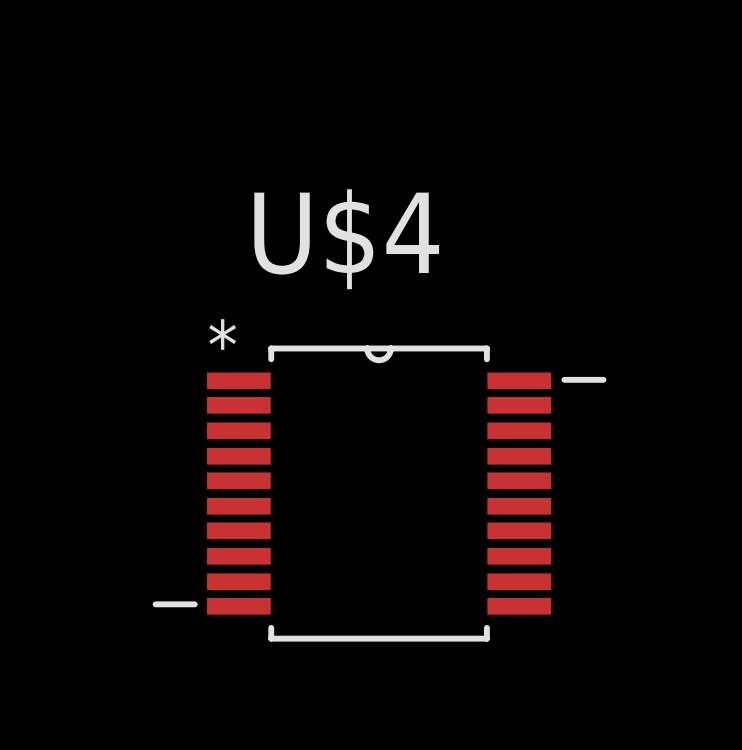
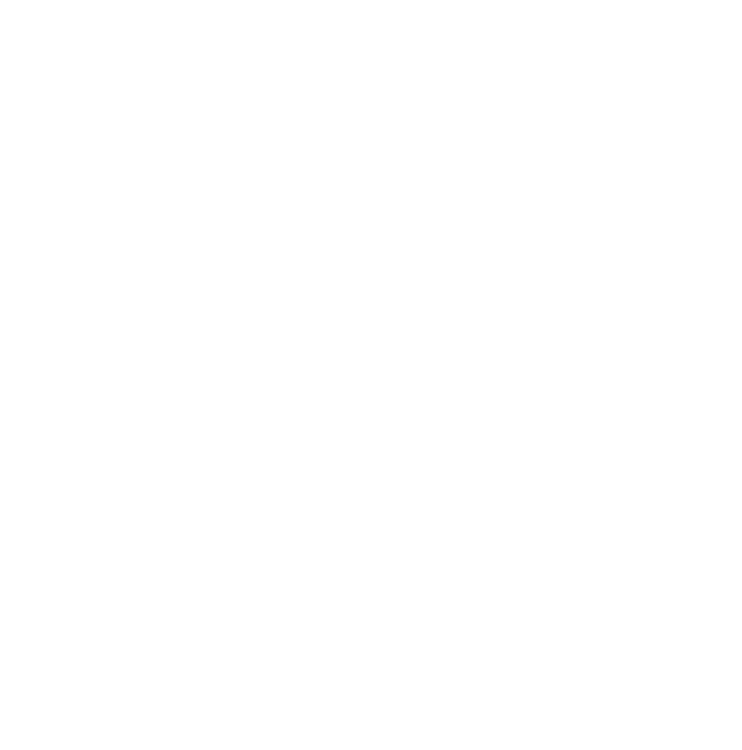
U$4: (379, 493) -> none

